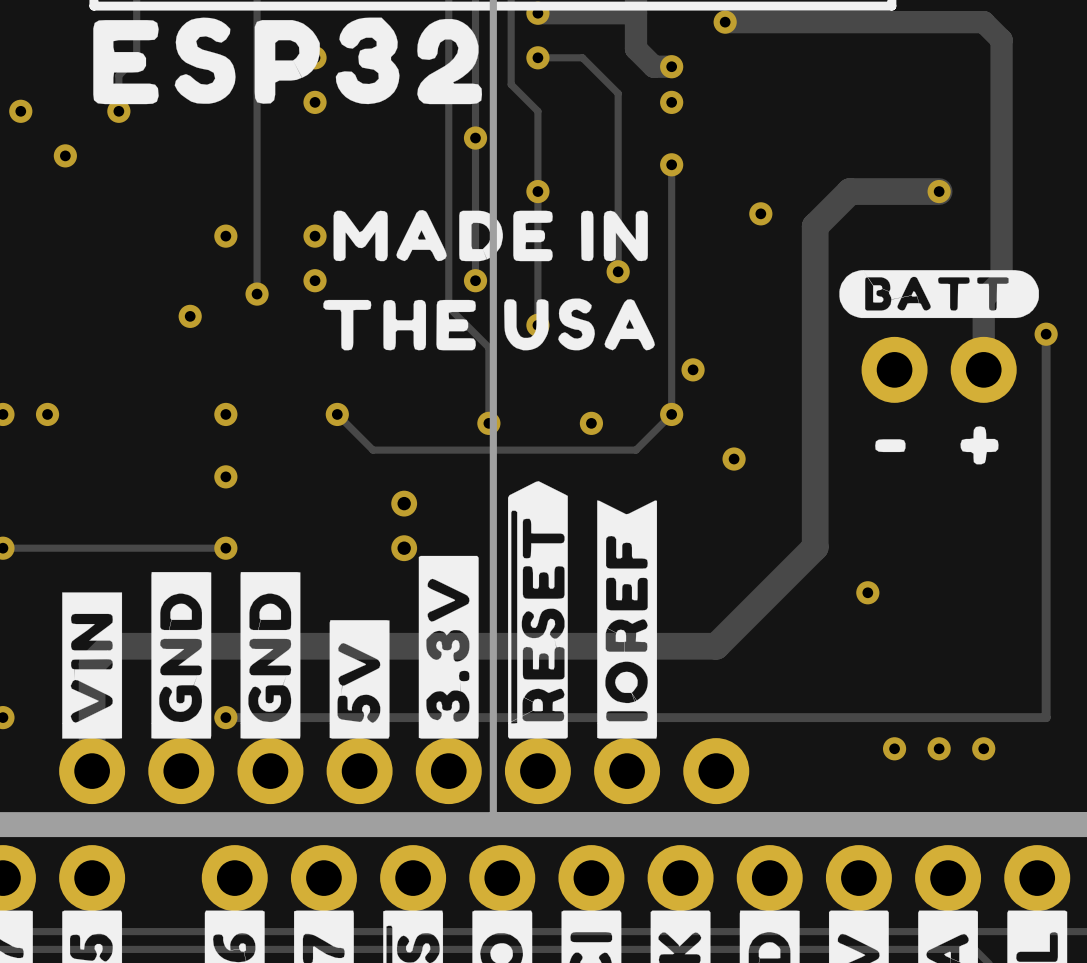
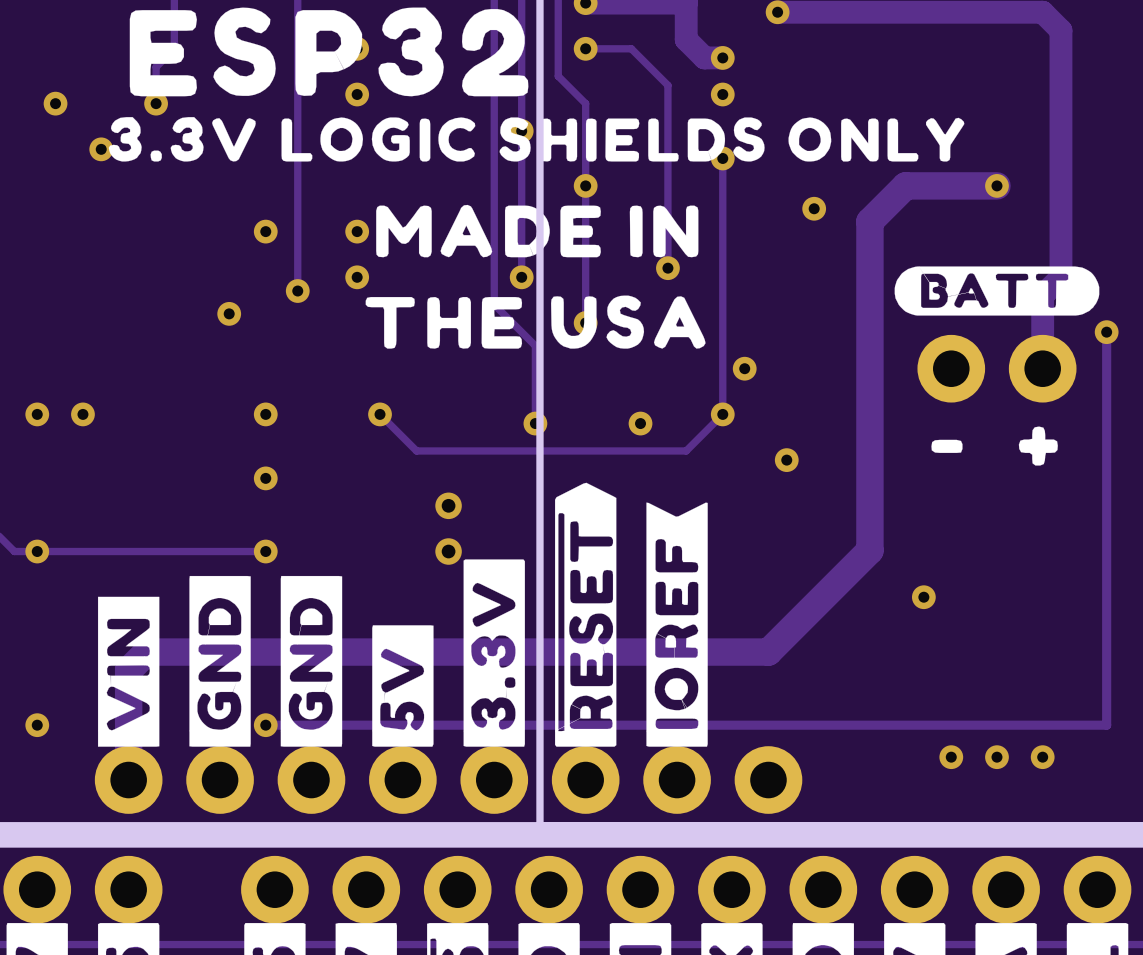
drawing: none -> [108, 117, 965, 162]

